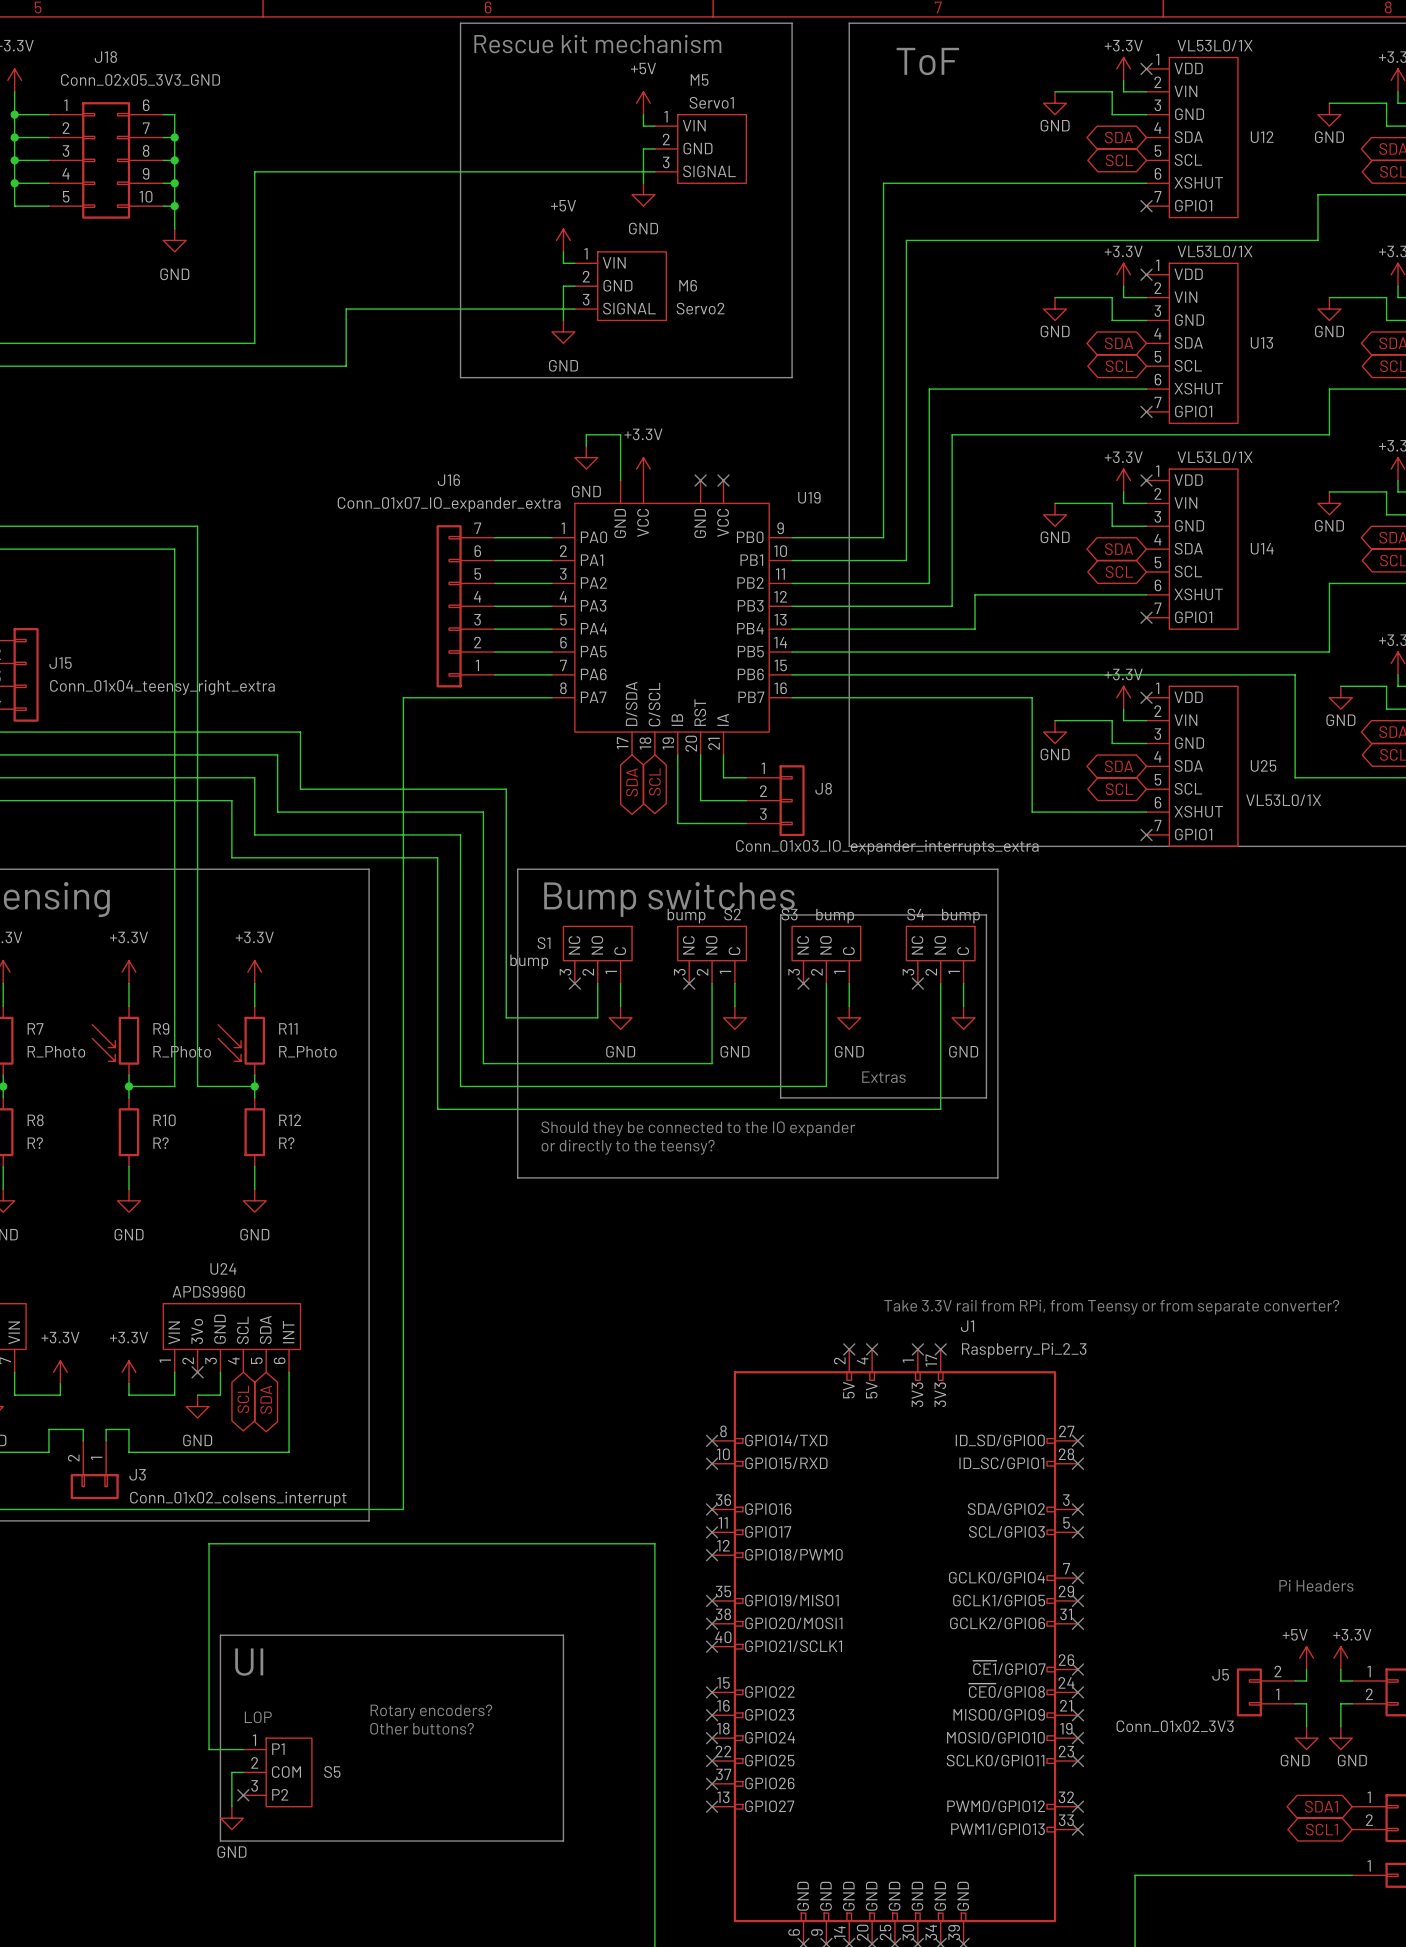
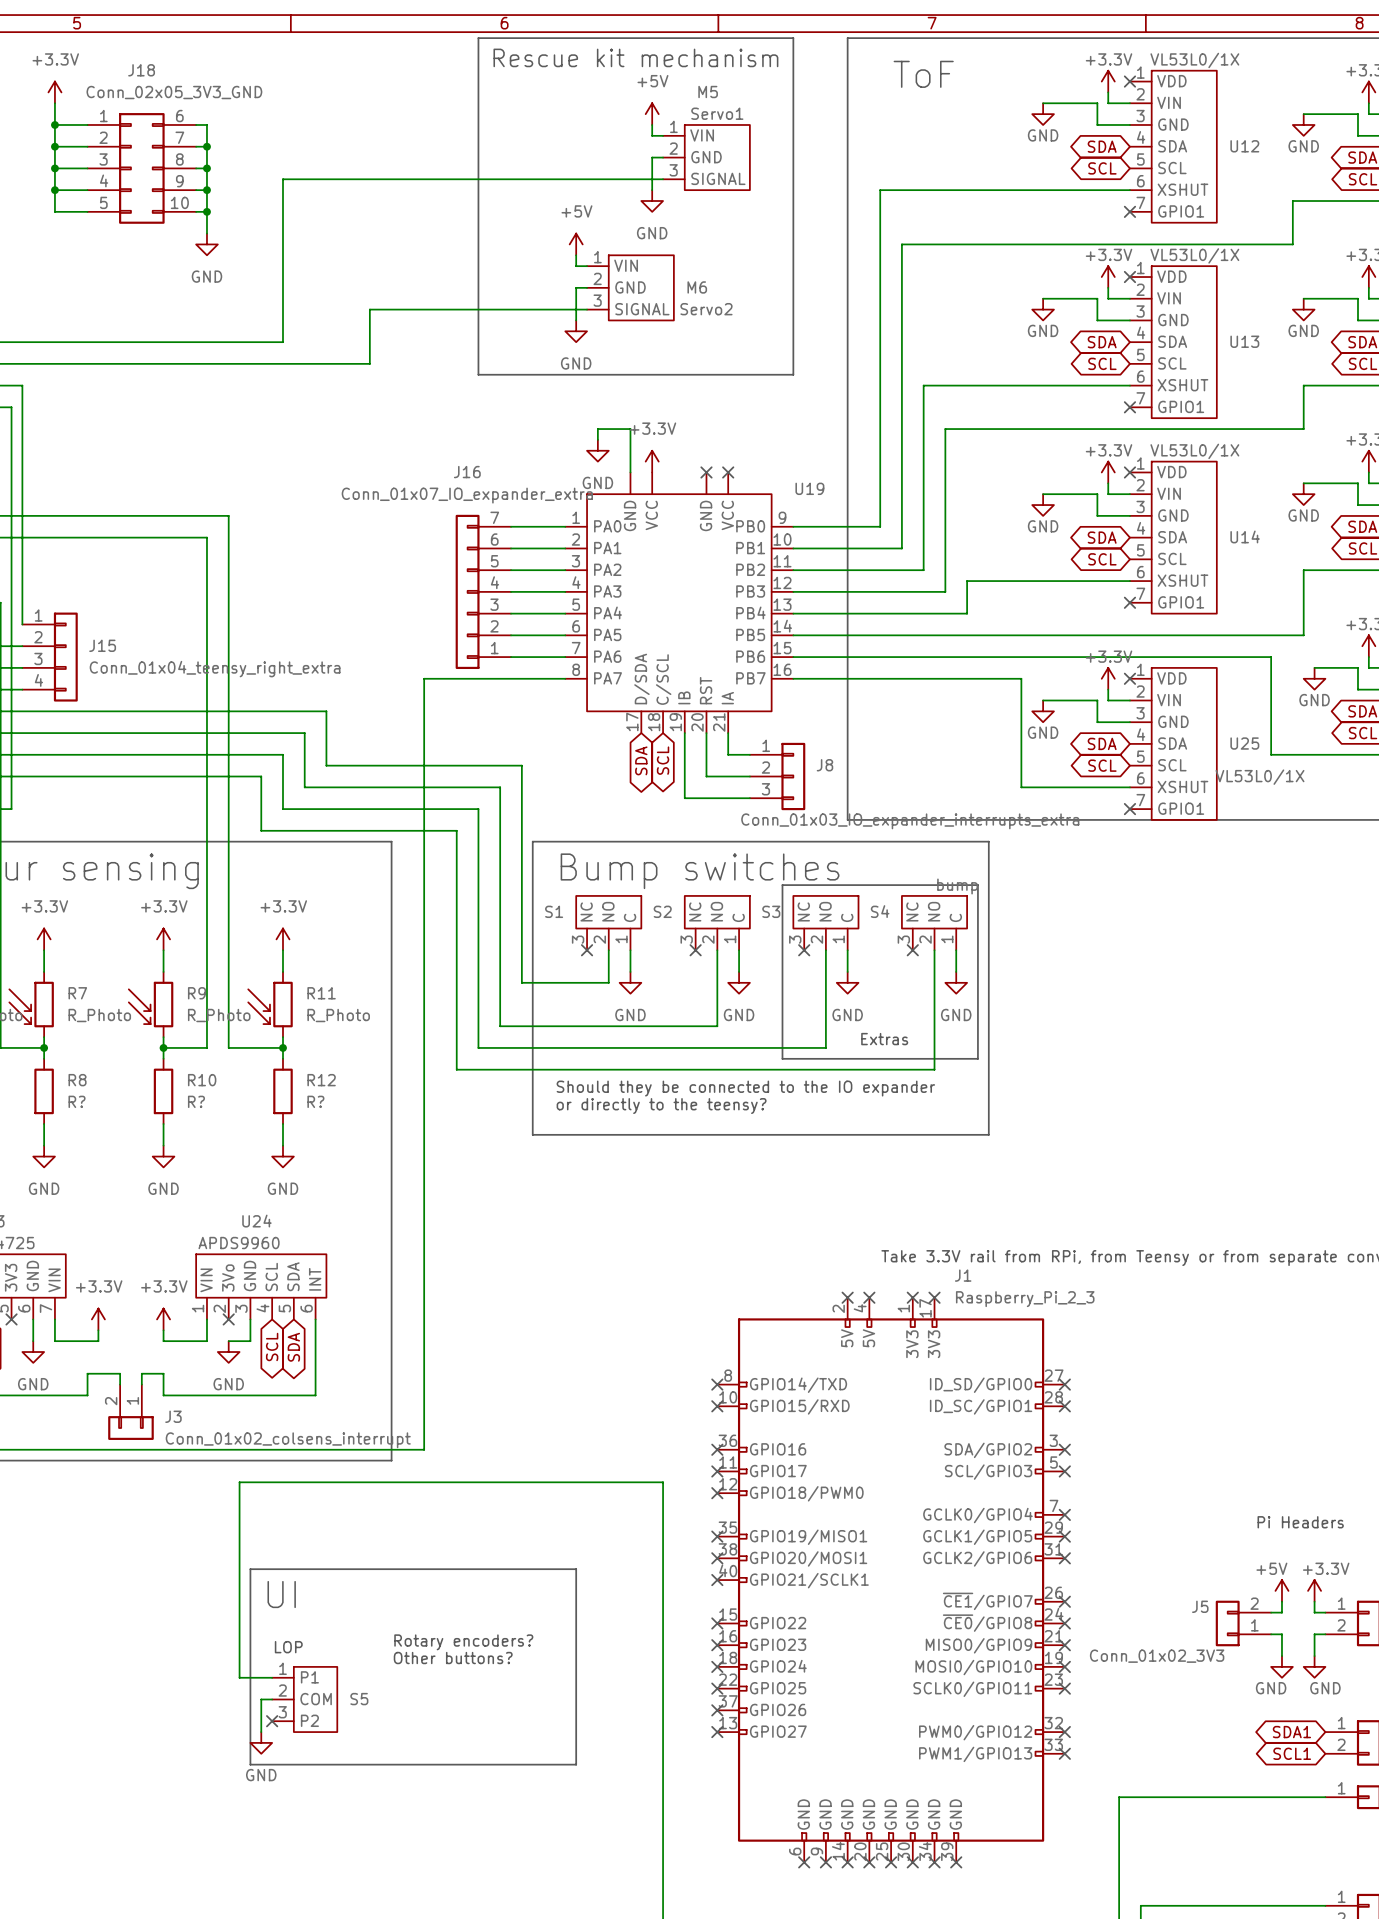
S2 name position: S2 (732, 914) -> S2 (662, 911)
S3 name position: S3 (789, 914) -> S3 (771, 911)
S4 name position: S4 (915, 914) -> S4 (880, 911)
S2 value: bump (686, 916) -> none
S3 value: bump (835, 916) -> none
S1 value: bump (529, 961) -> none

